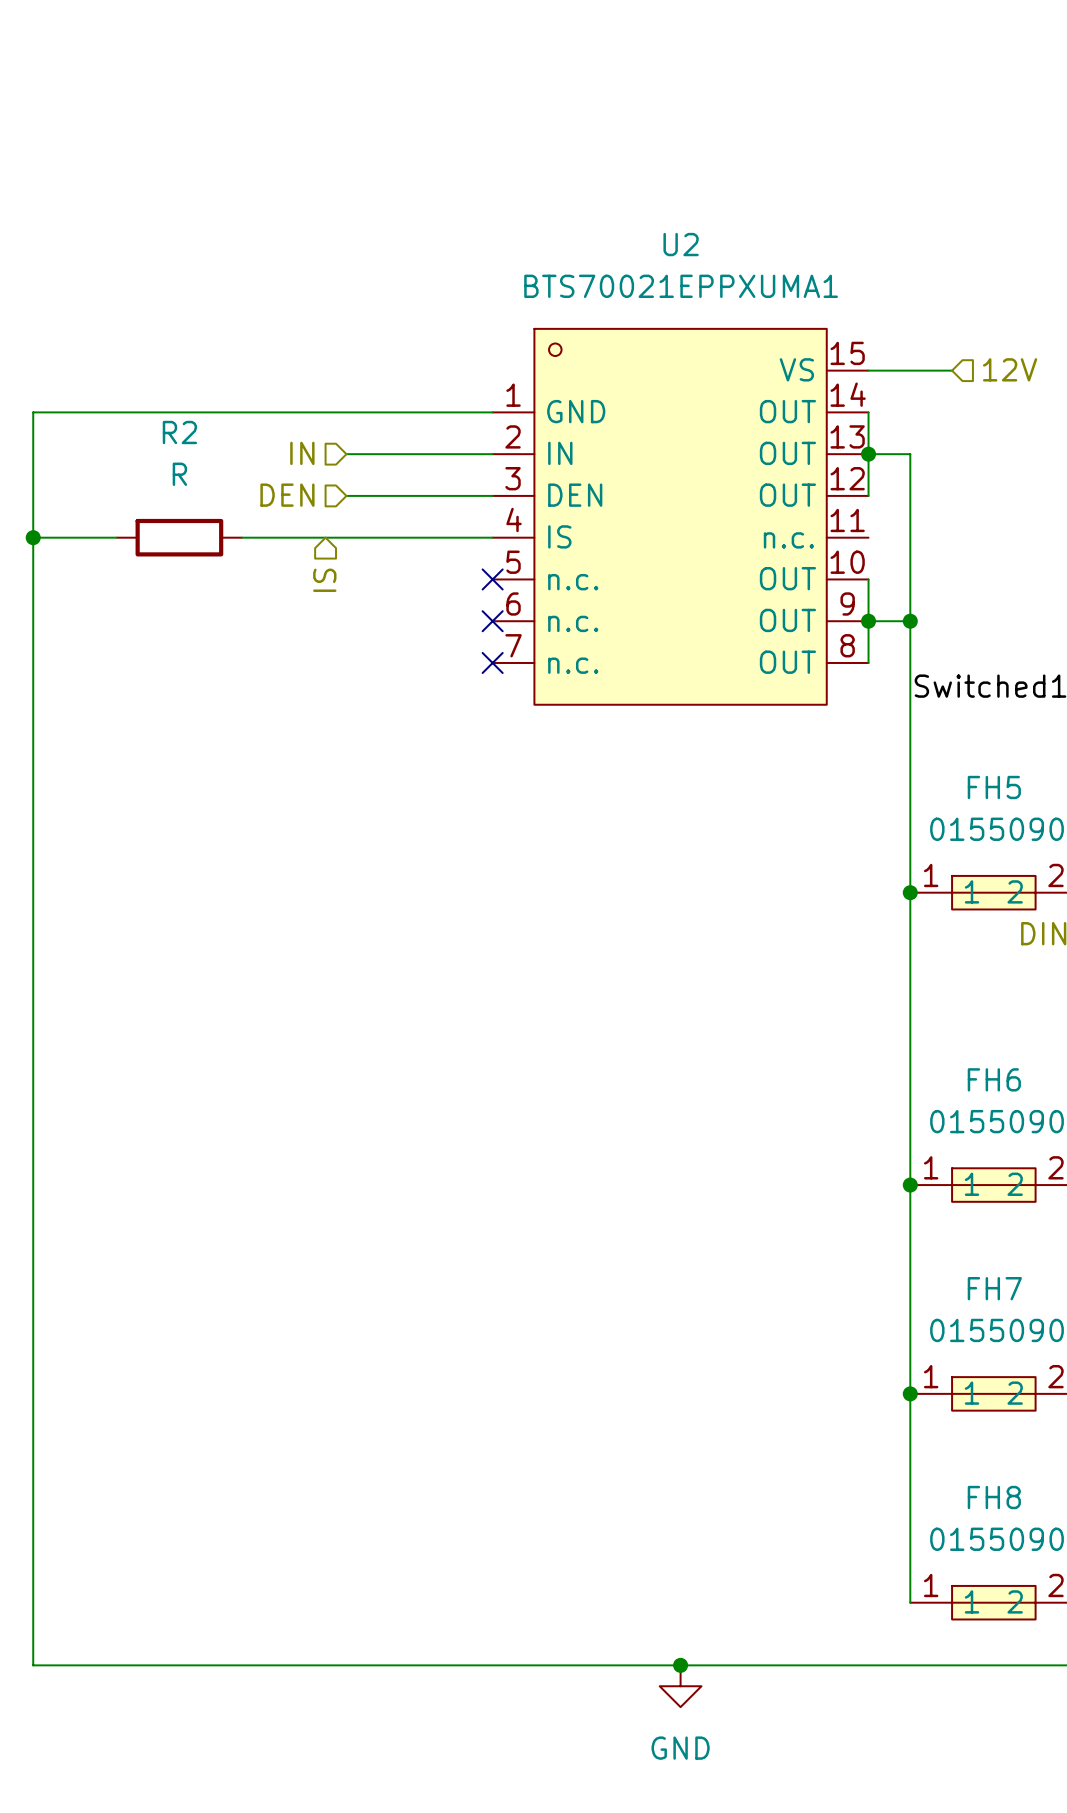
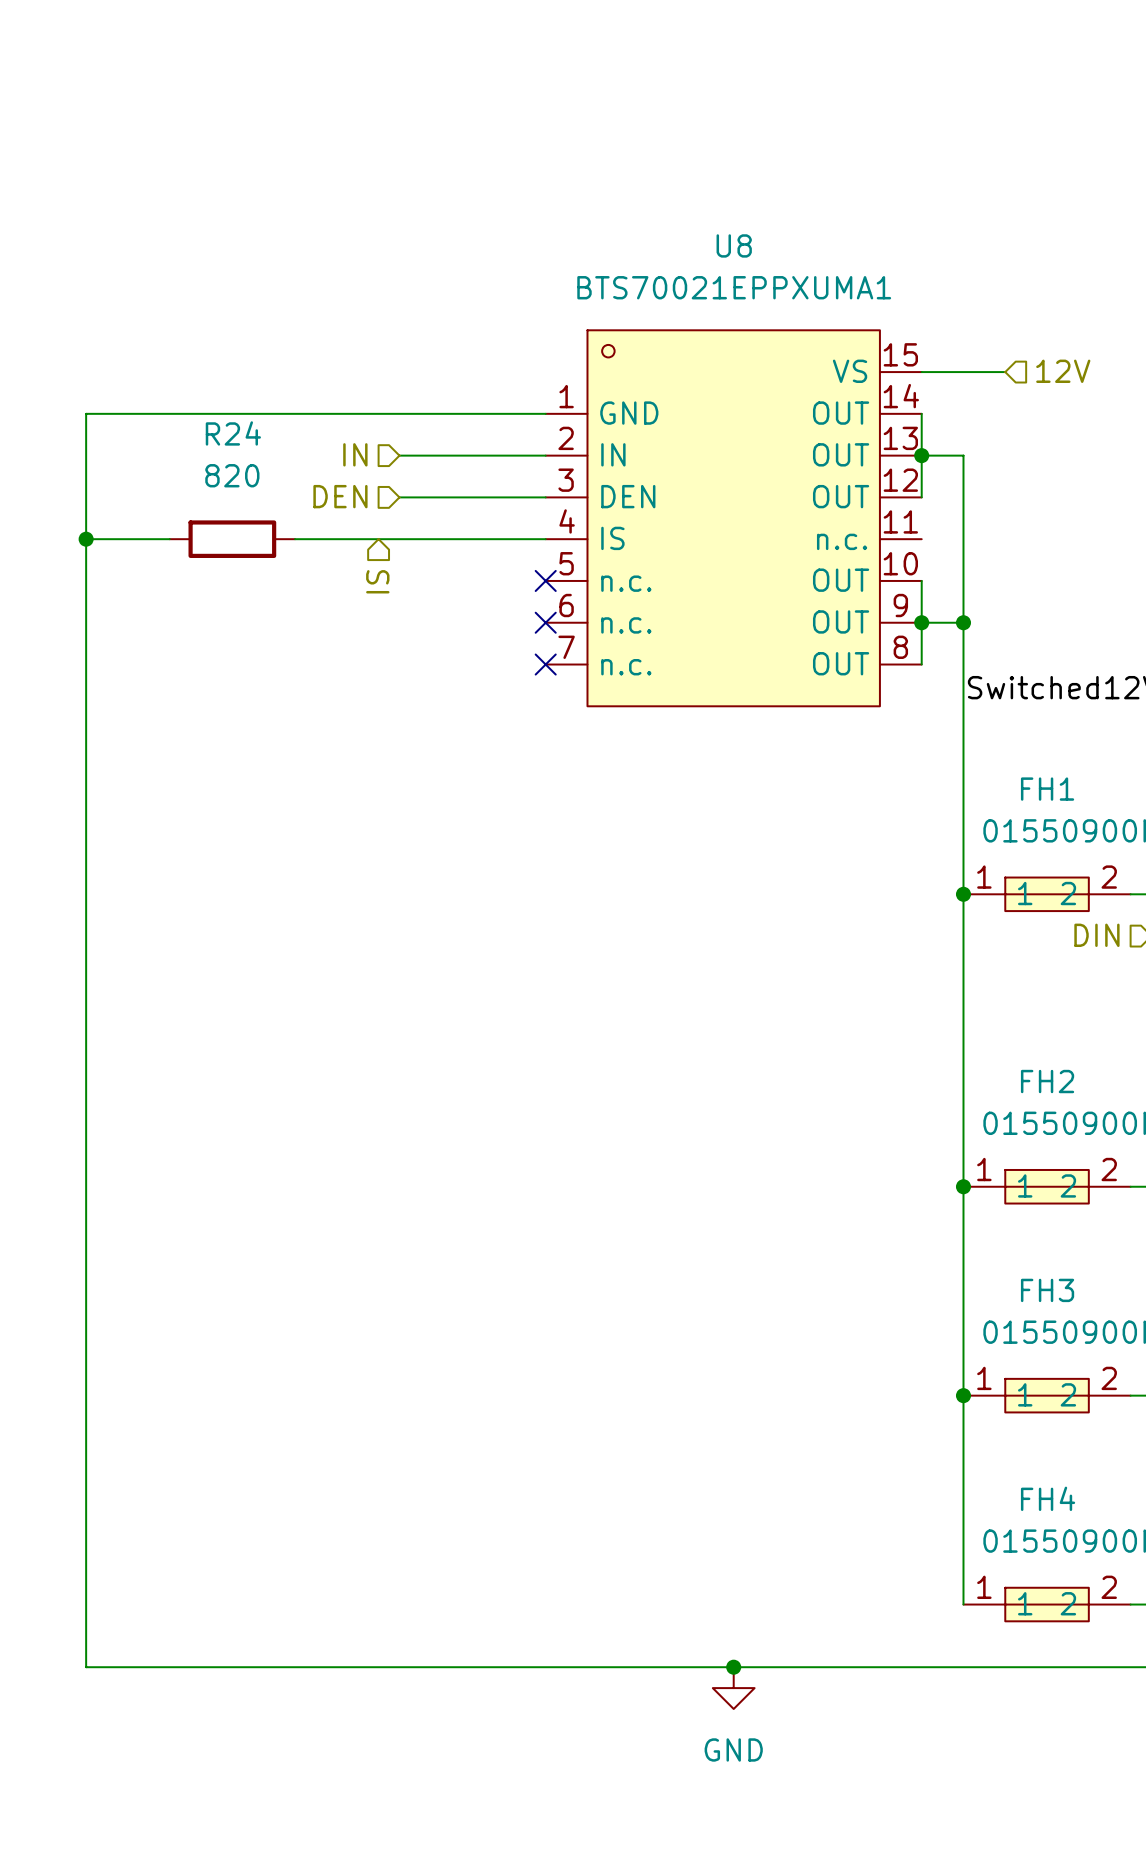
U2 name: U2 (681, 244) -> U8 (734, 245)
R2 name: R2 (179, 432) -> R24 (233, 433)
R2 value: R (179, 474) -> 820 (232, 475)
FH5 name: FH5 (994, 787) -> FH1 (1047, 789)
FH6 name: FH6 (994, 1079) -> FH2 (1047, 1081)
FH7 name: FH7 (994, 1288) -> FH3 (1047, 1290)
FH8 name: FH8 (994, 1497) -> FH4 (1048, 1498)

